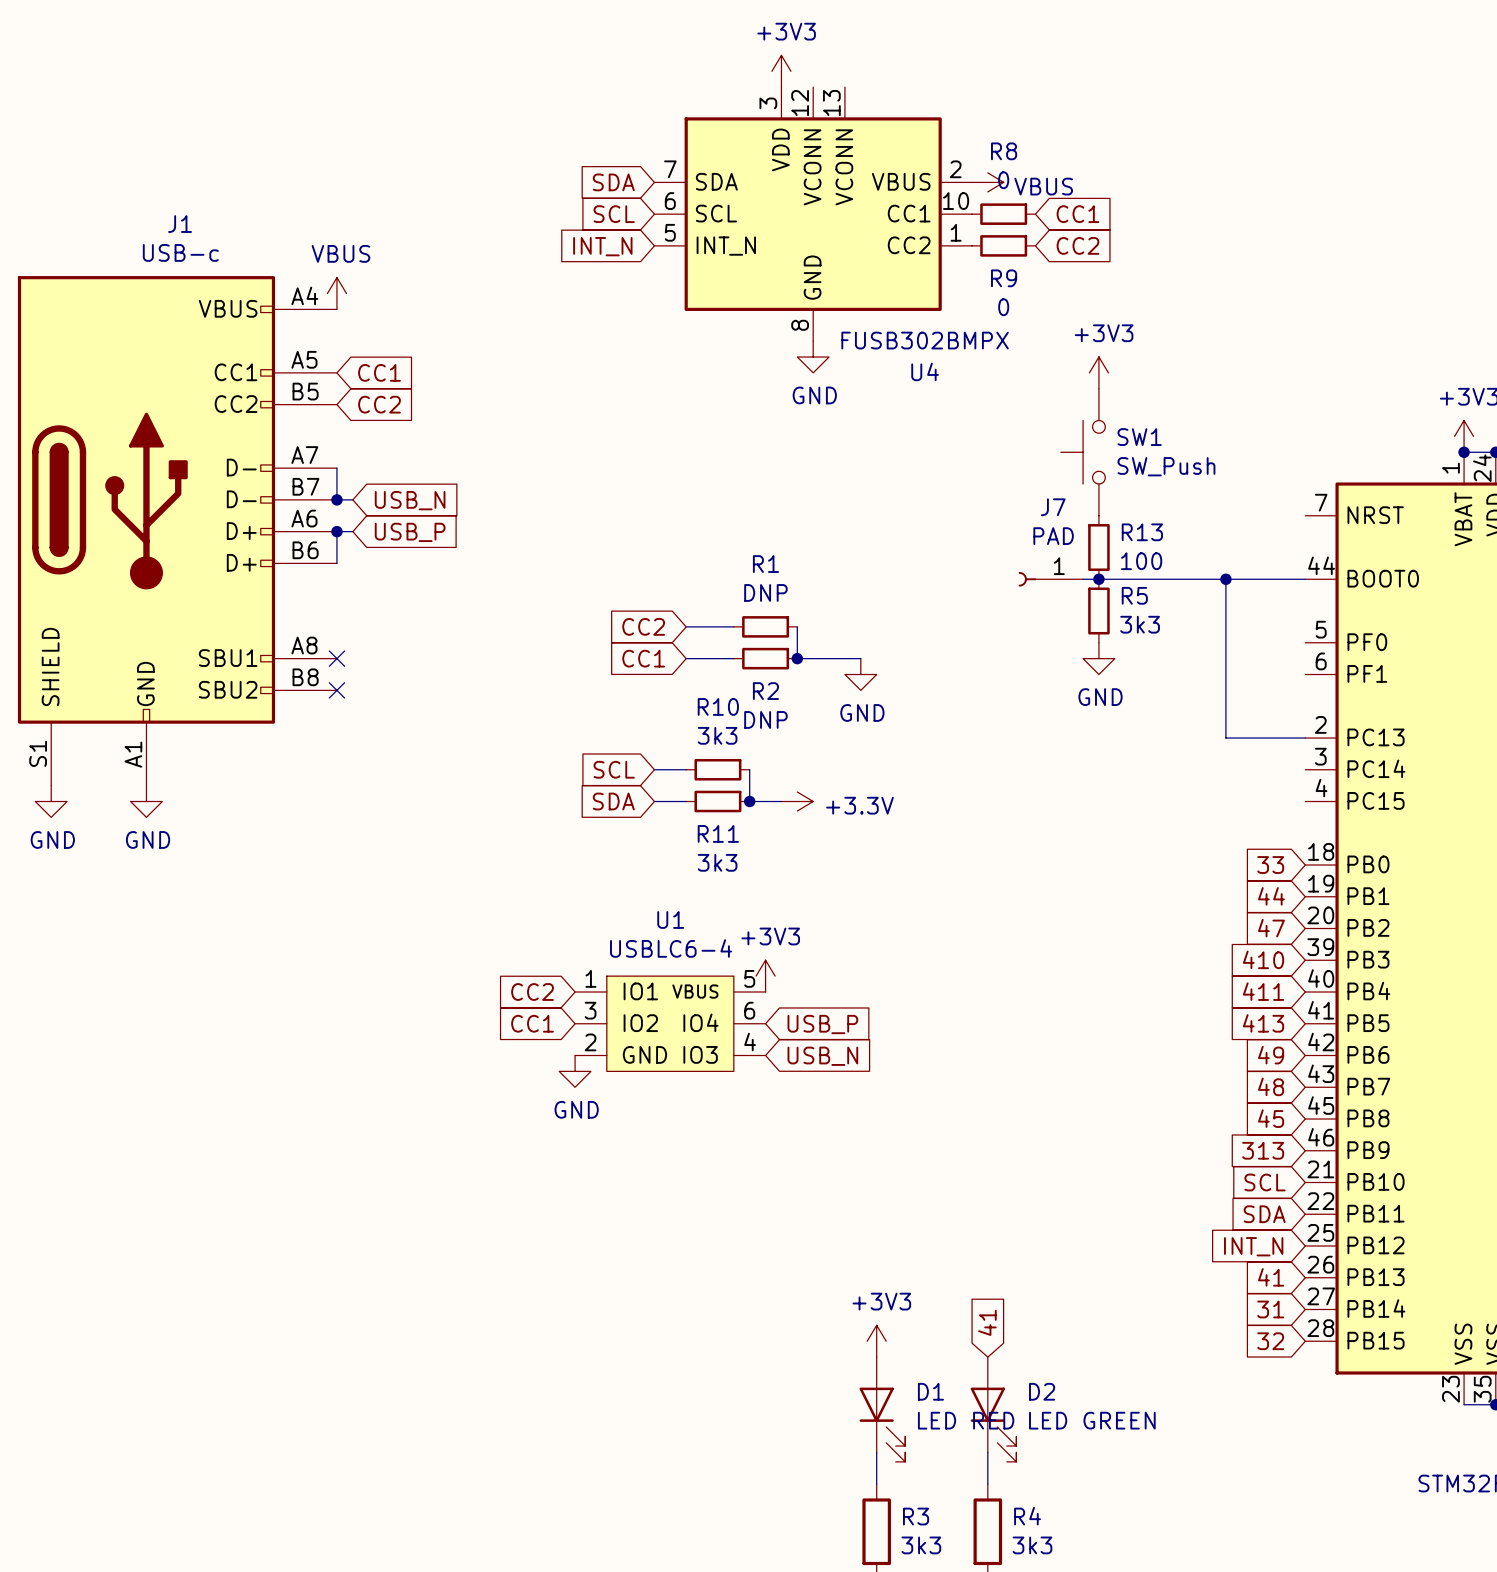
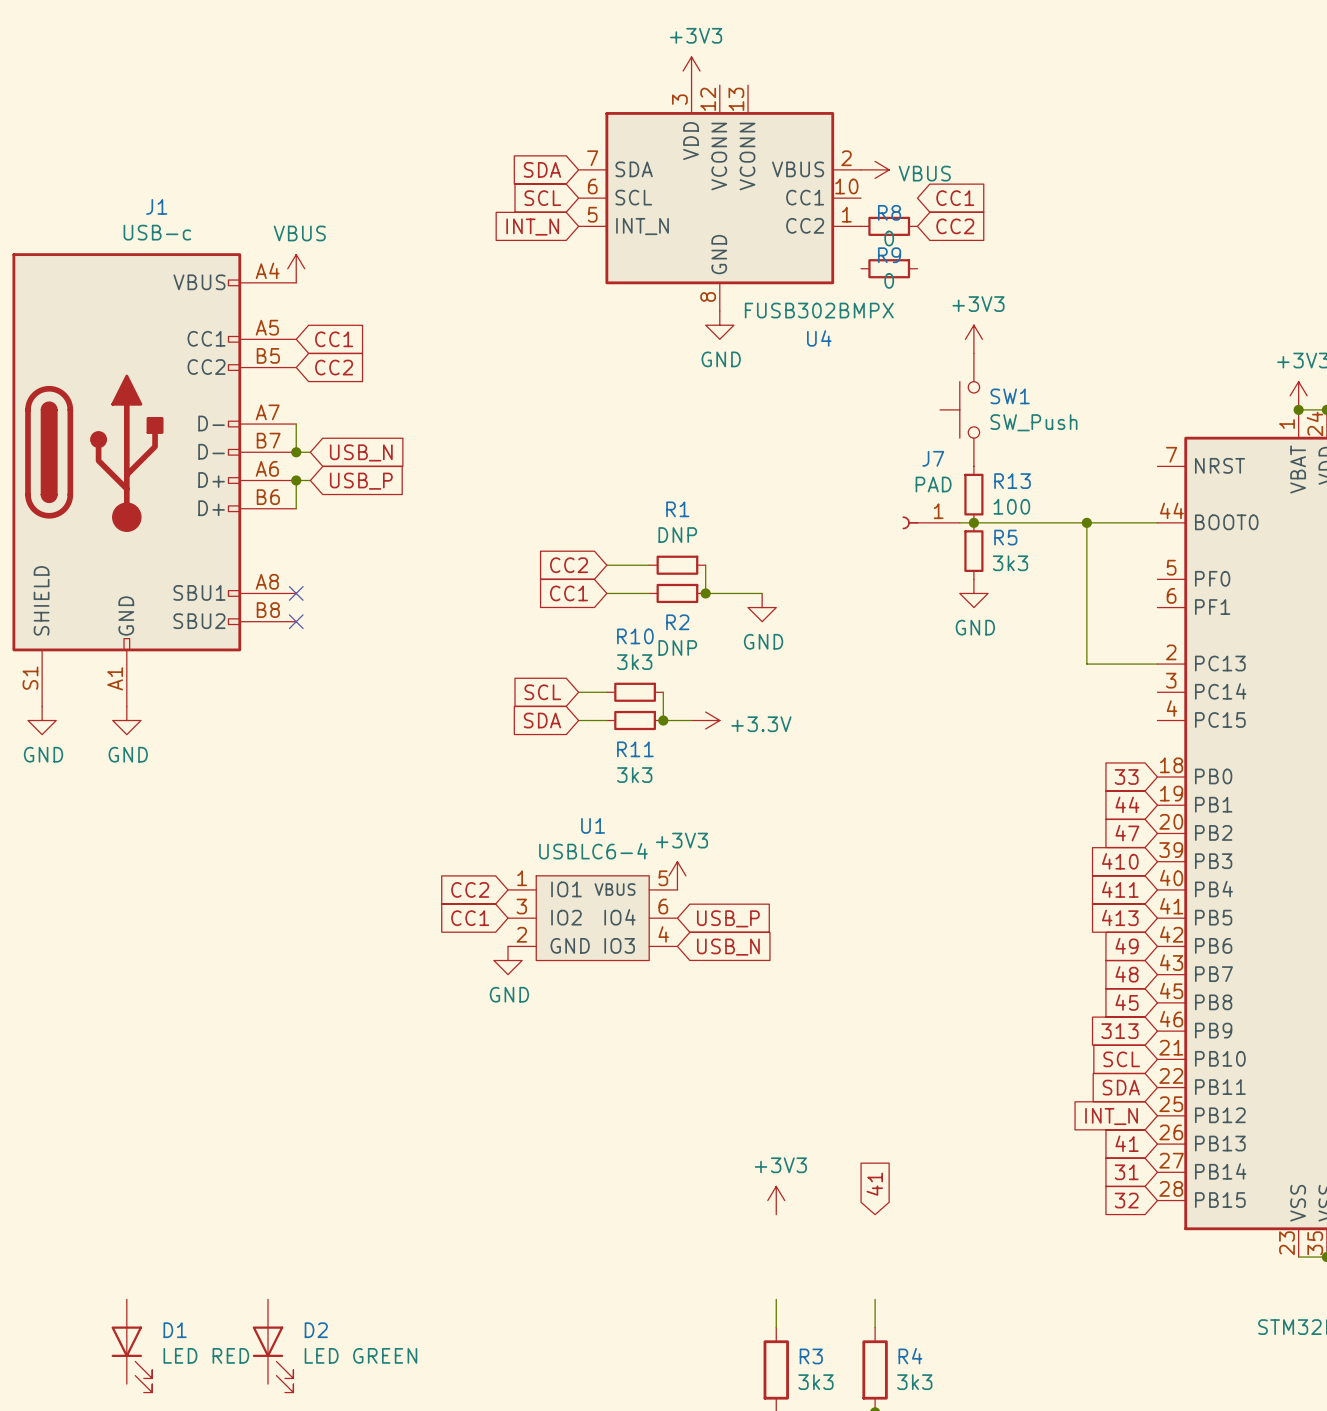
R8 position: (1003, 214) -> (889, 268)
D1 position: (882, 1409) -> (131, 1345)
D2 position: (993, 1409) -> (273, 1345)

